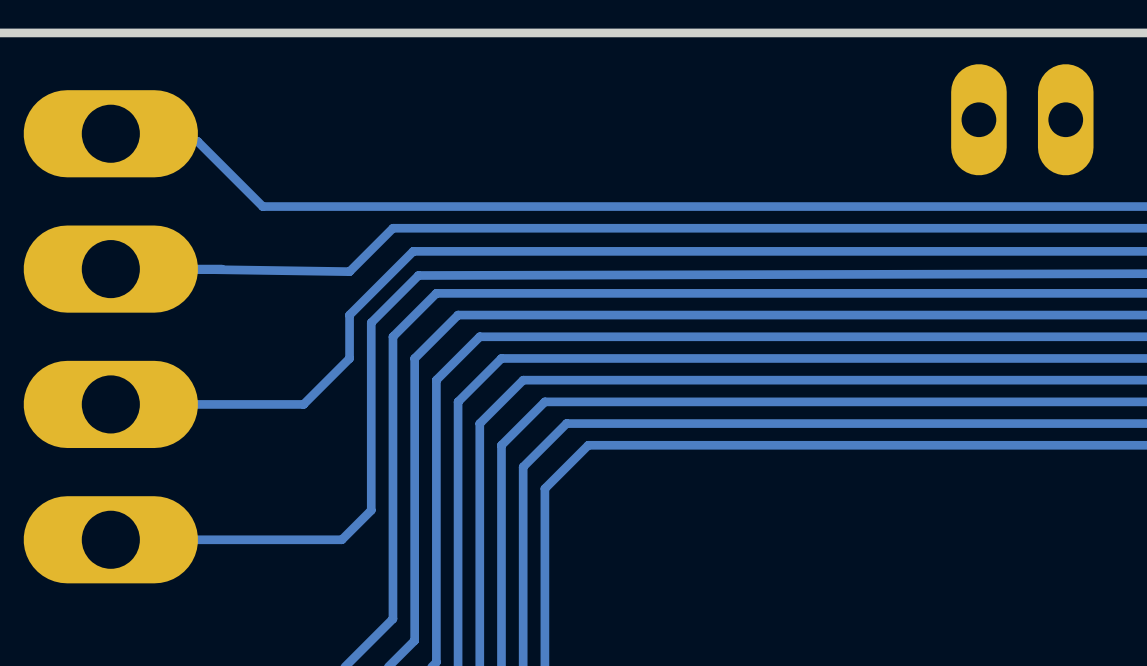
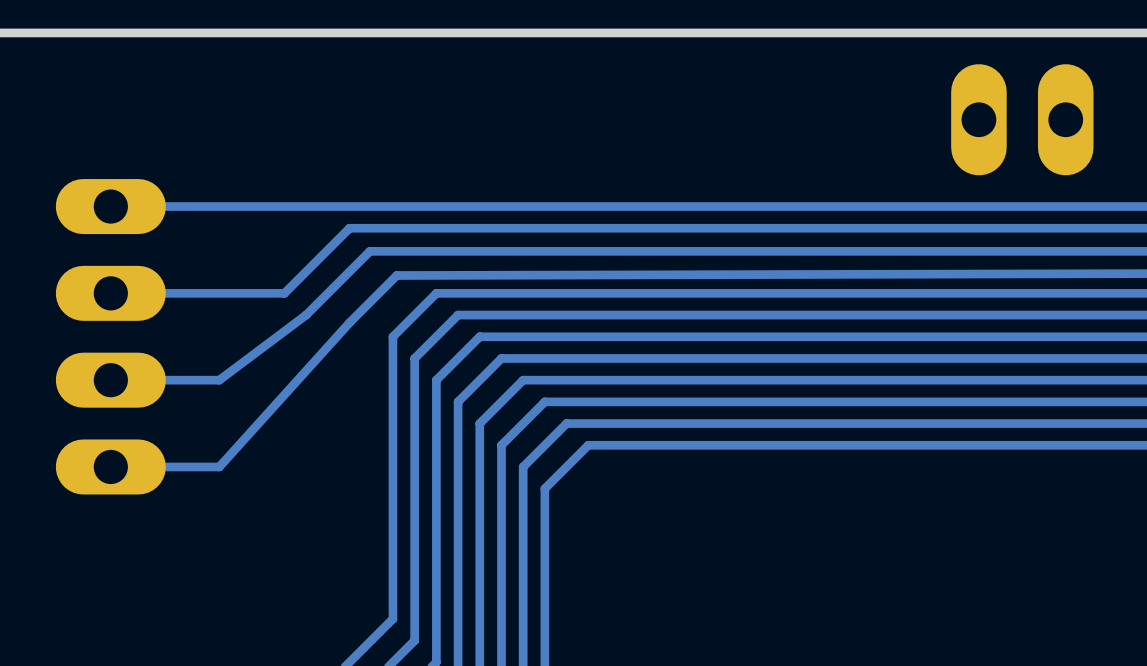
part footprint: [23, 90, 198, 584] -> [55, 179, 166, 495]
bottom track: (110, 133) (118, 141) (197, 141) (262, 206) -> (110, 206) (262, 206)
bottom track: (392, 228) (369, 251) -> (413, 251) (369, 251)
bottom track: none -> (392, 228) (349, 228) (284, 293) (110, 293)
bottom track: (413, 251) (349, 315) (349, 358) (303, 404) (110, 404) -> none
bottom track: (175, 269) (349, 271) -> (110, 380) (219, 380) (306, 315) (349, 271)
bottom track: (418, 275) (371, 322) (371, 510) (341, 539) (110, 539) -> (418, 275) (396, 275) (349, 322) (219, 466) (110, 466)

